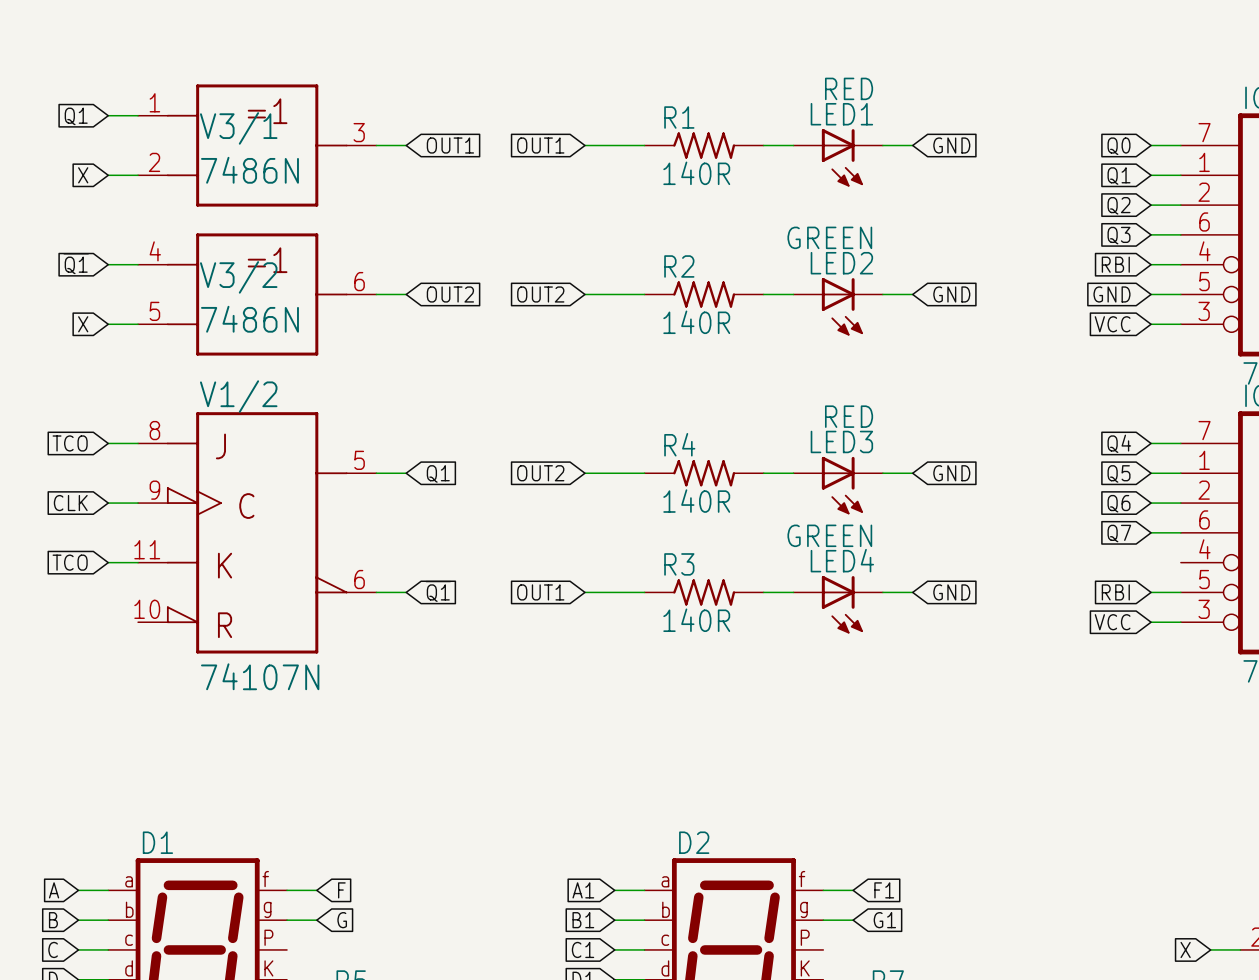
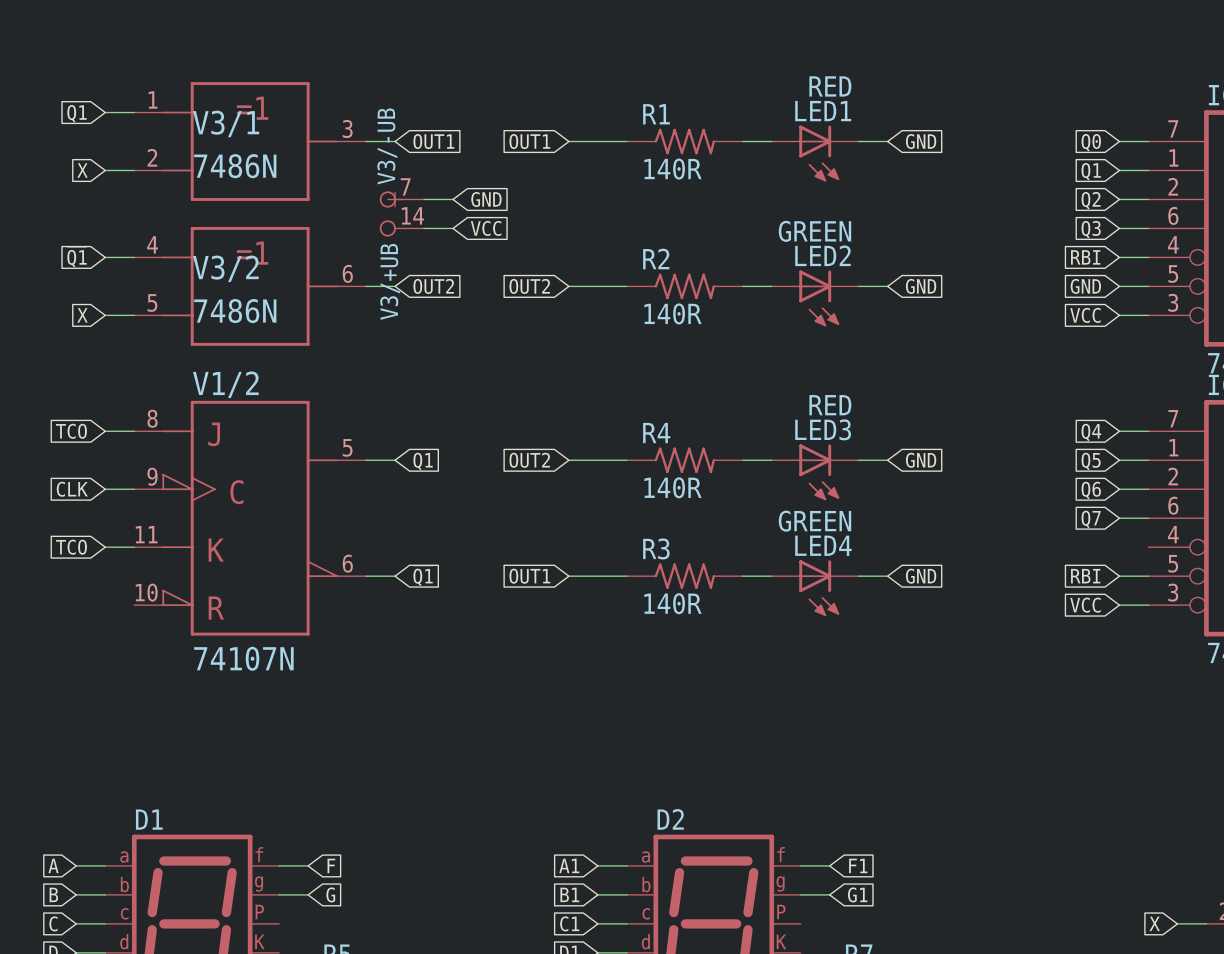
V3/-UB: none -> (401, 199)
wire: none -> (424, 199) (453, 199)
global label: none -> GND (486, 199)
V3/+UB: none -> (401, 228)
wire: none -> (424, 228) (453, 228)
global label: none -> VCC (486, 228)

